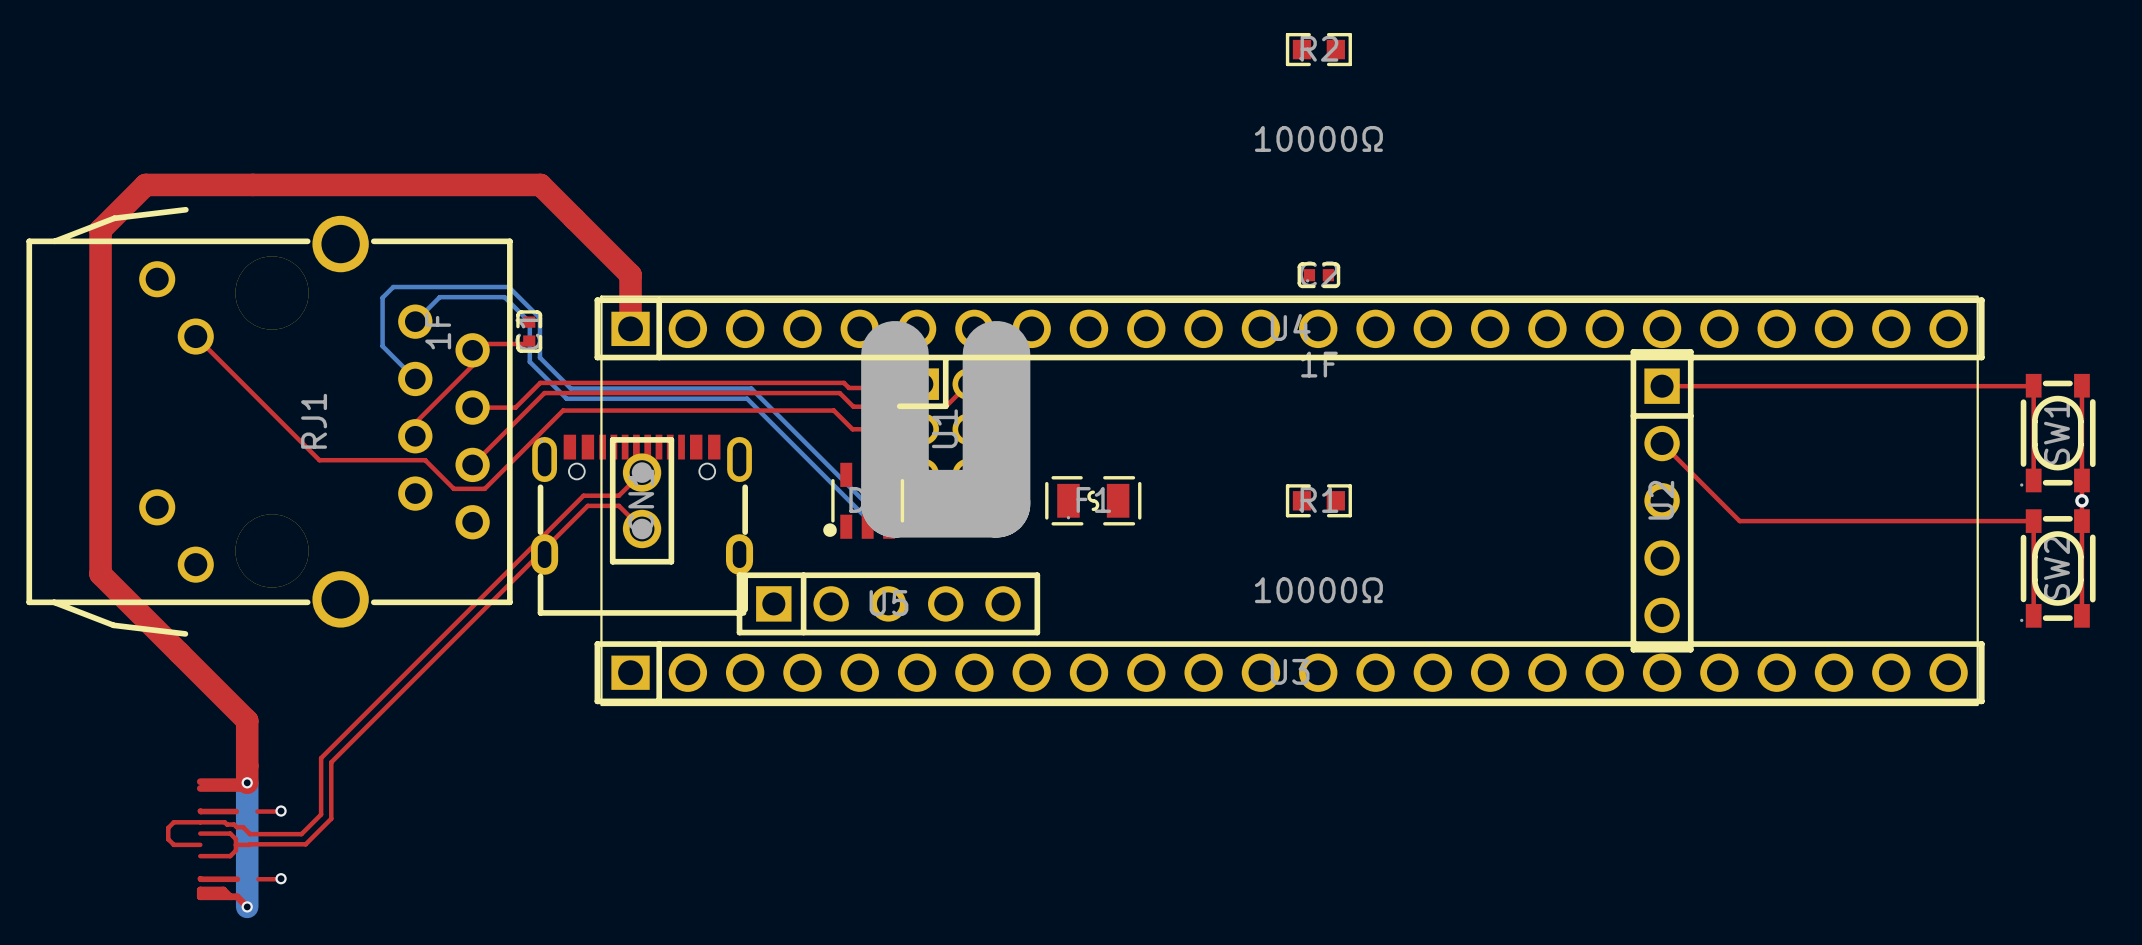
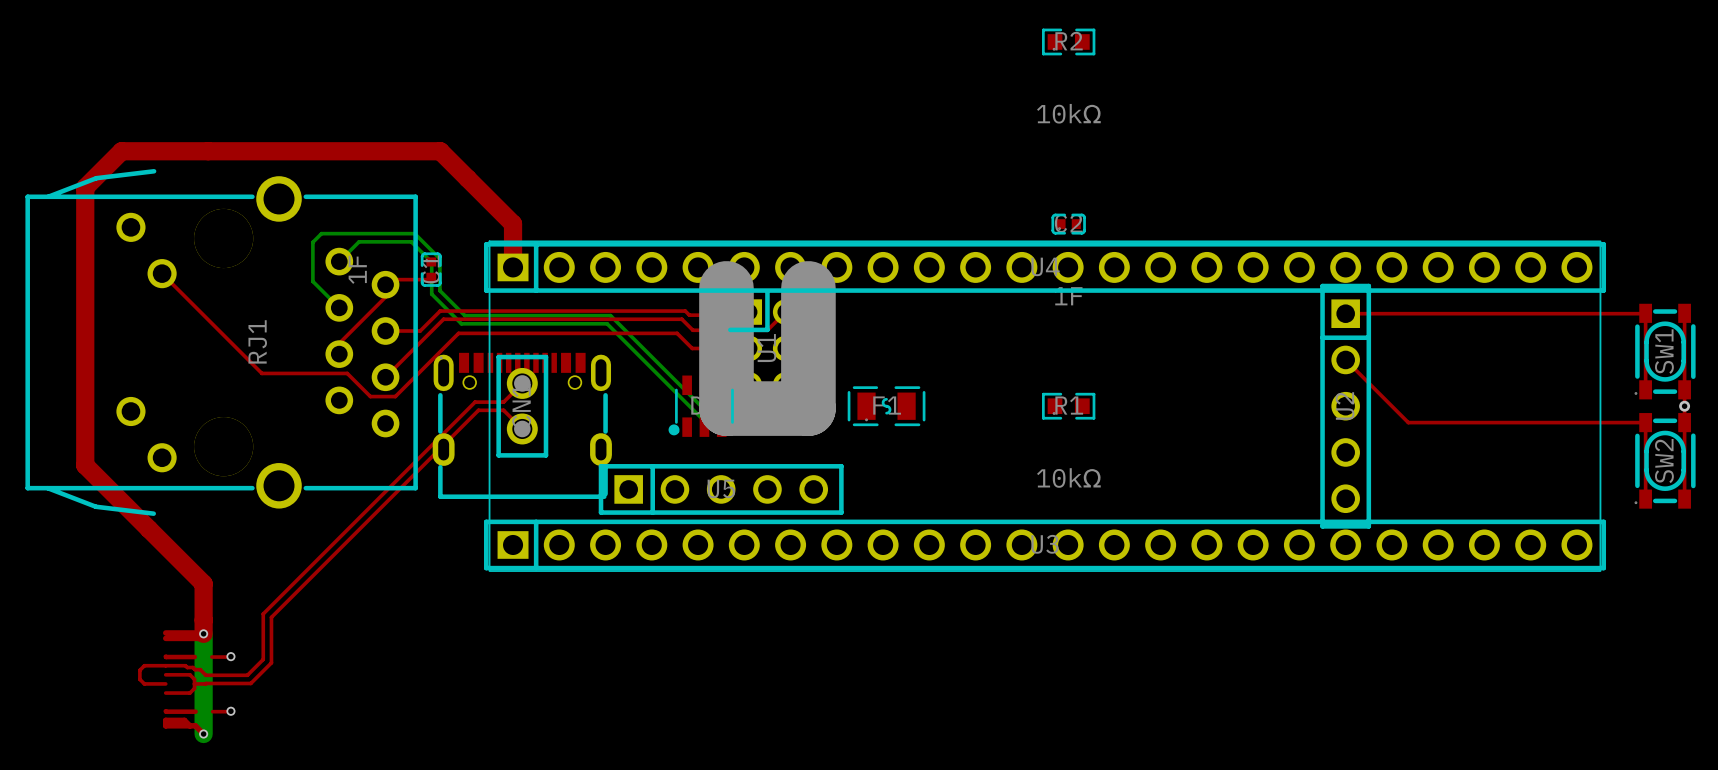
R2 value: 10000Ω (1318, 138) -> 10kΩ (1068, 113)
R1 value: 10000Ω (1318, 590) -> 10kΩ (1068, 477)

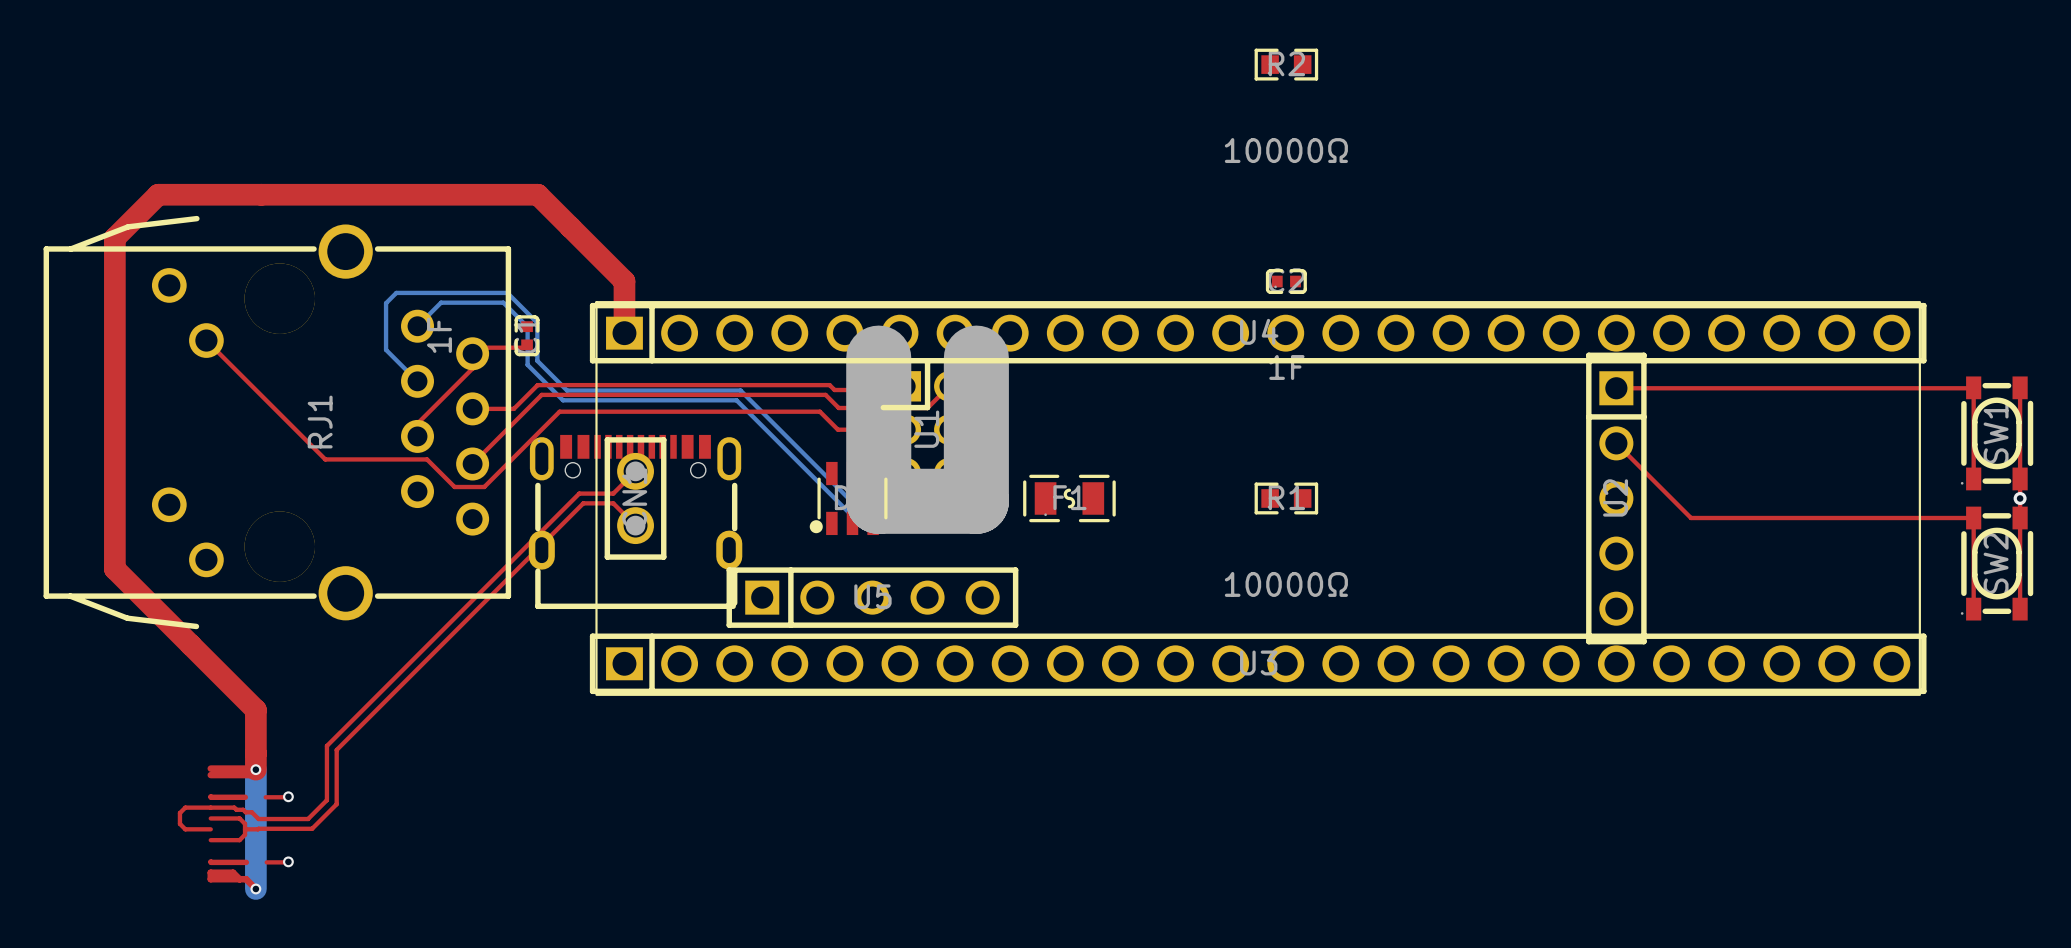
R2 value: 10kΩ (1068, 113) -> 10000Ω (1286, 150)
R1 value: 10kΩ (1068, 477) -> 10000Ω (1286, 584)

